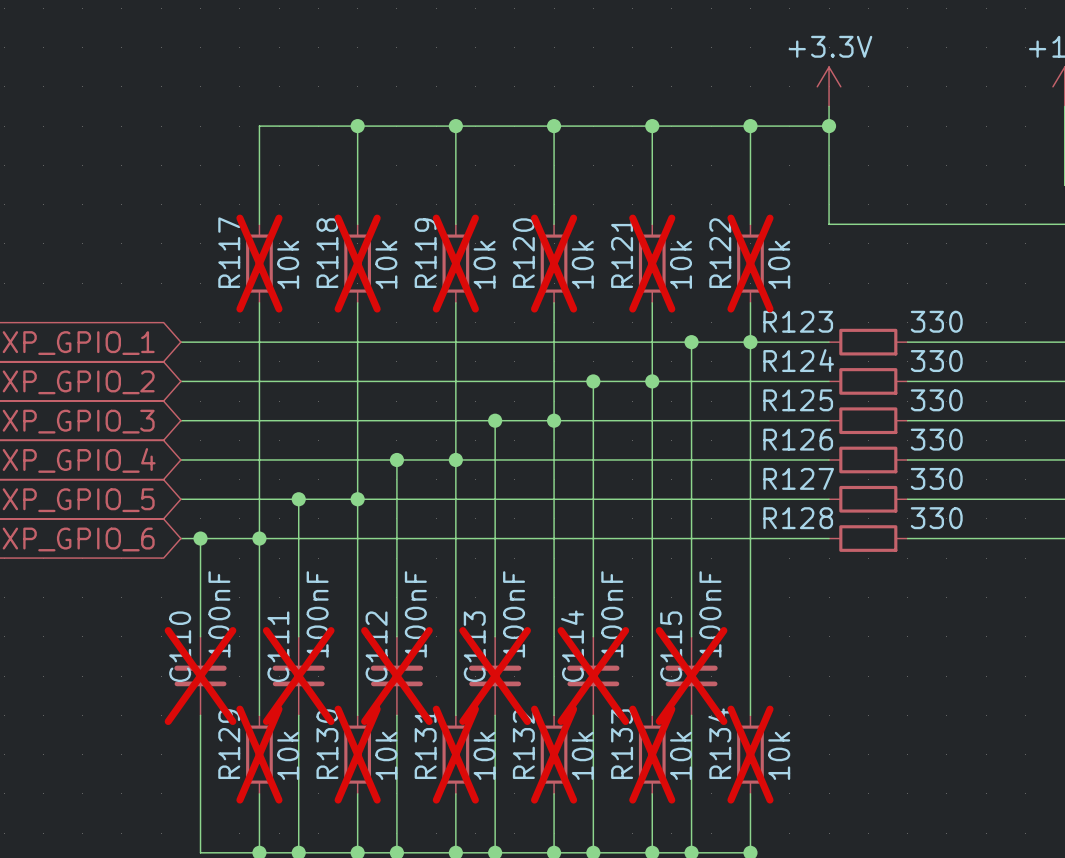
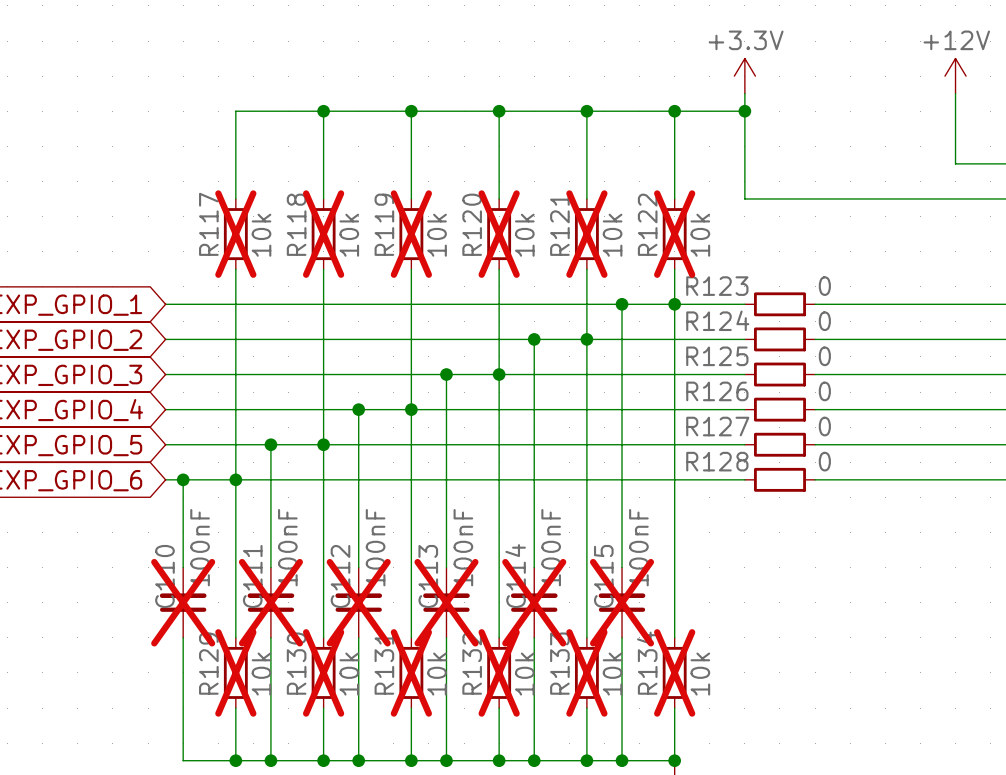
R123 value: 330 (936, 321) -> 0 (824, 286)
R124 value: 330 (936, 361) -> 0 (824, 321)
R125 value: 330 (936, 400) -> 0 (824, 356)
R126 value: 330 (936, 439) -> 0 (824, 391)
R127 value: 330 (936, 478) -> 0 (824, 426)
R128 value: 330 (936, 518) -> 0 (824, 461)

